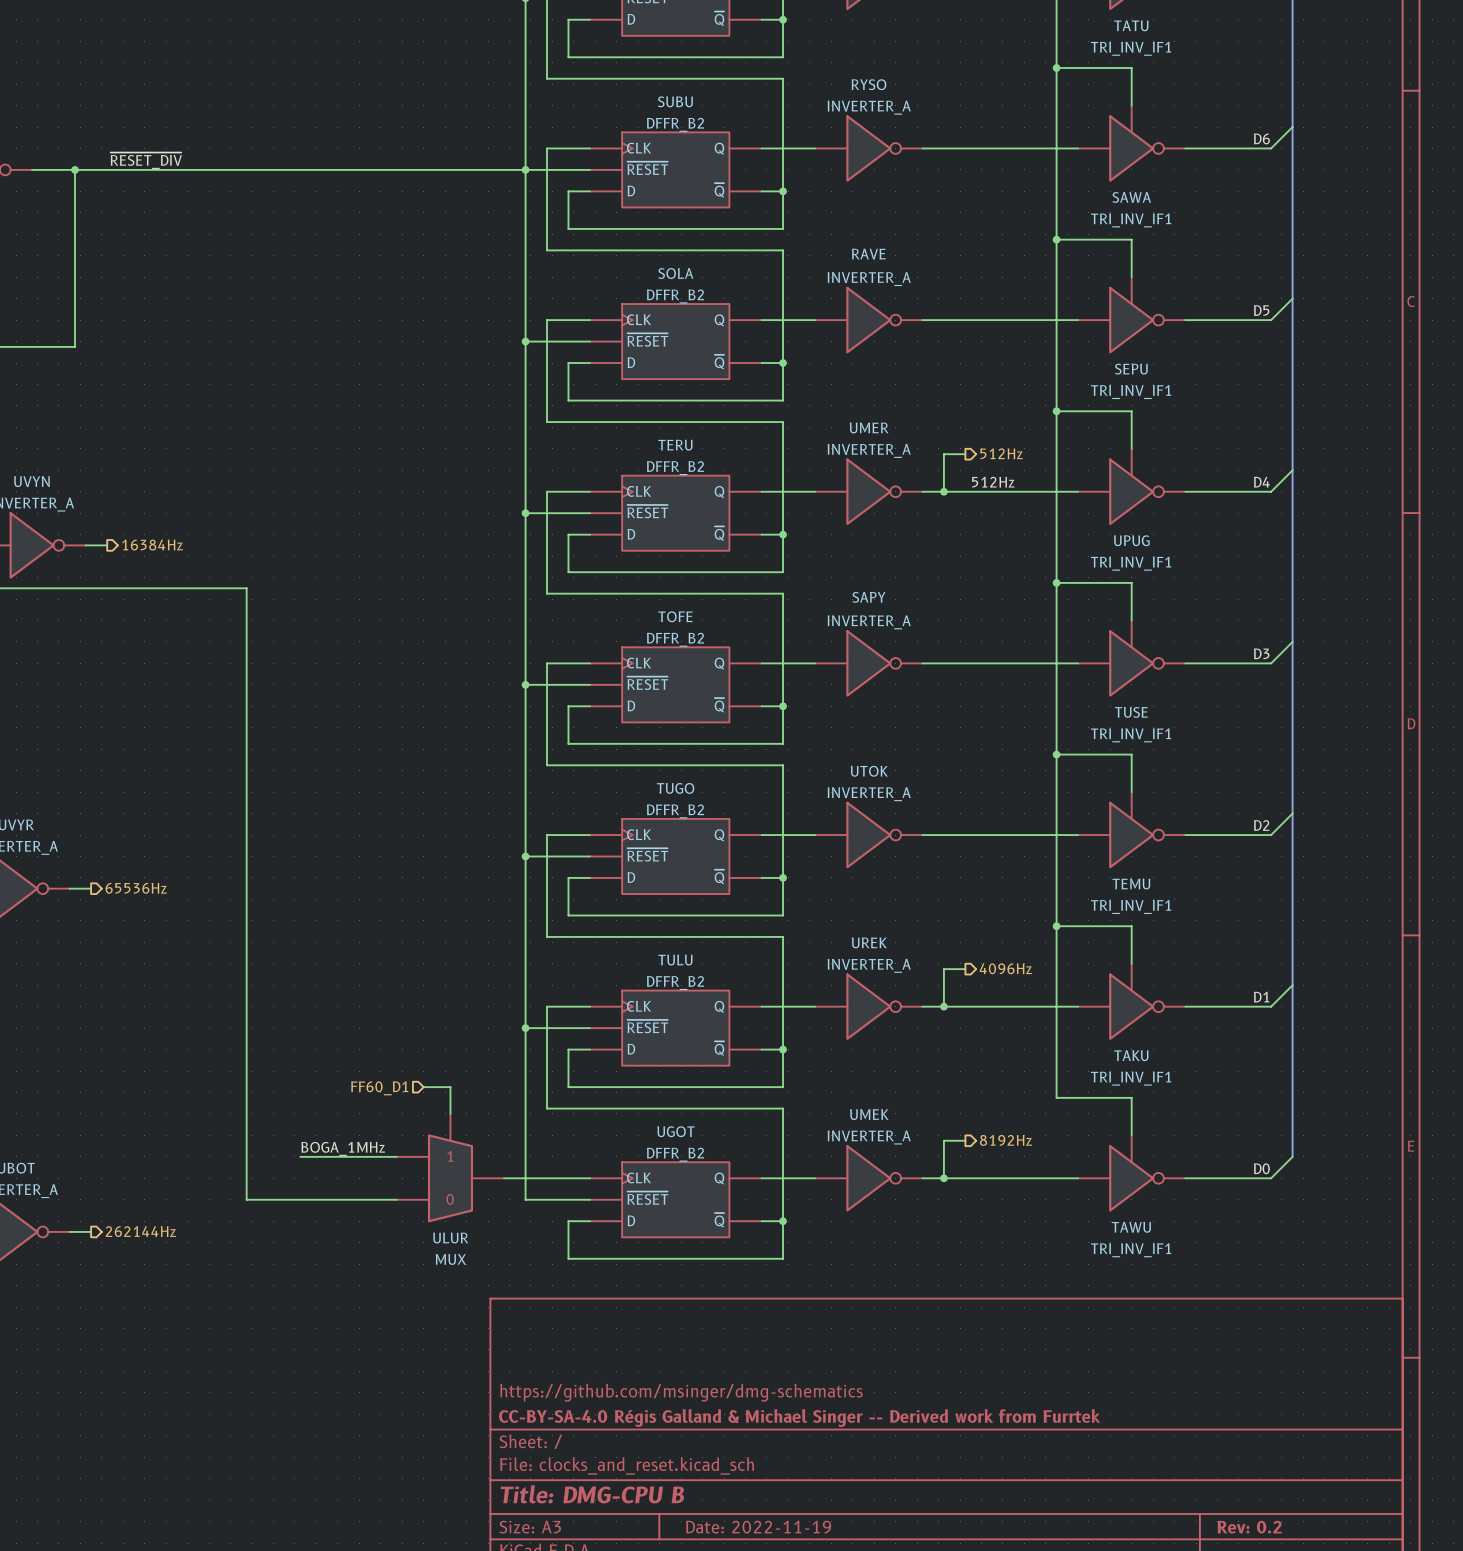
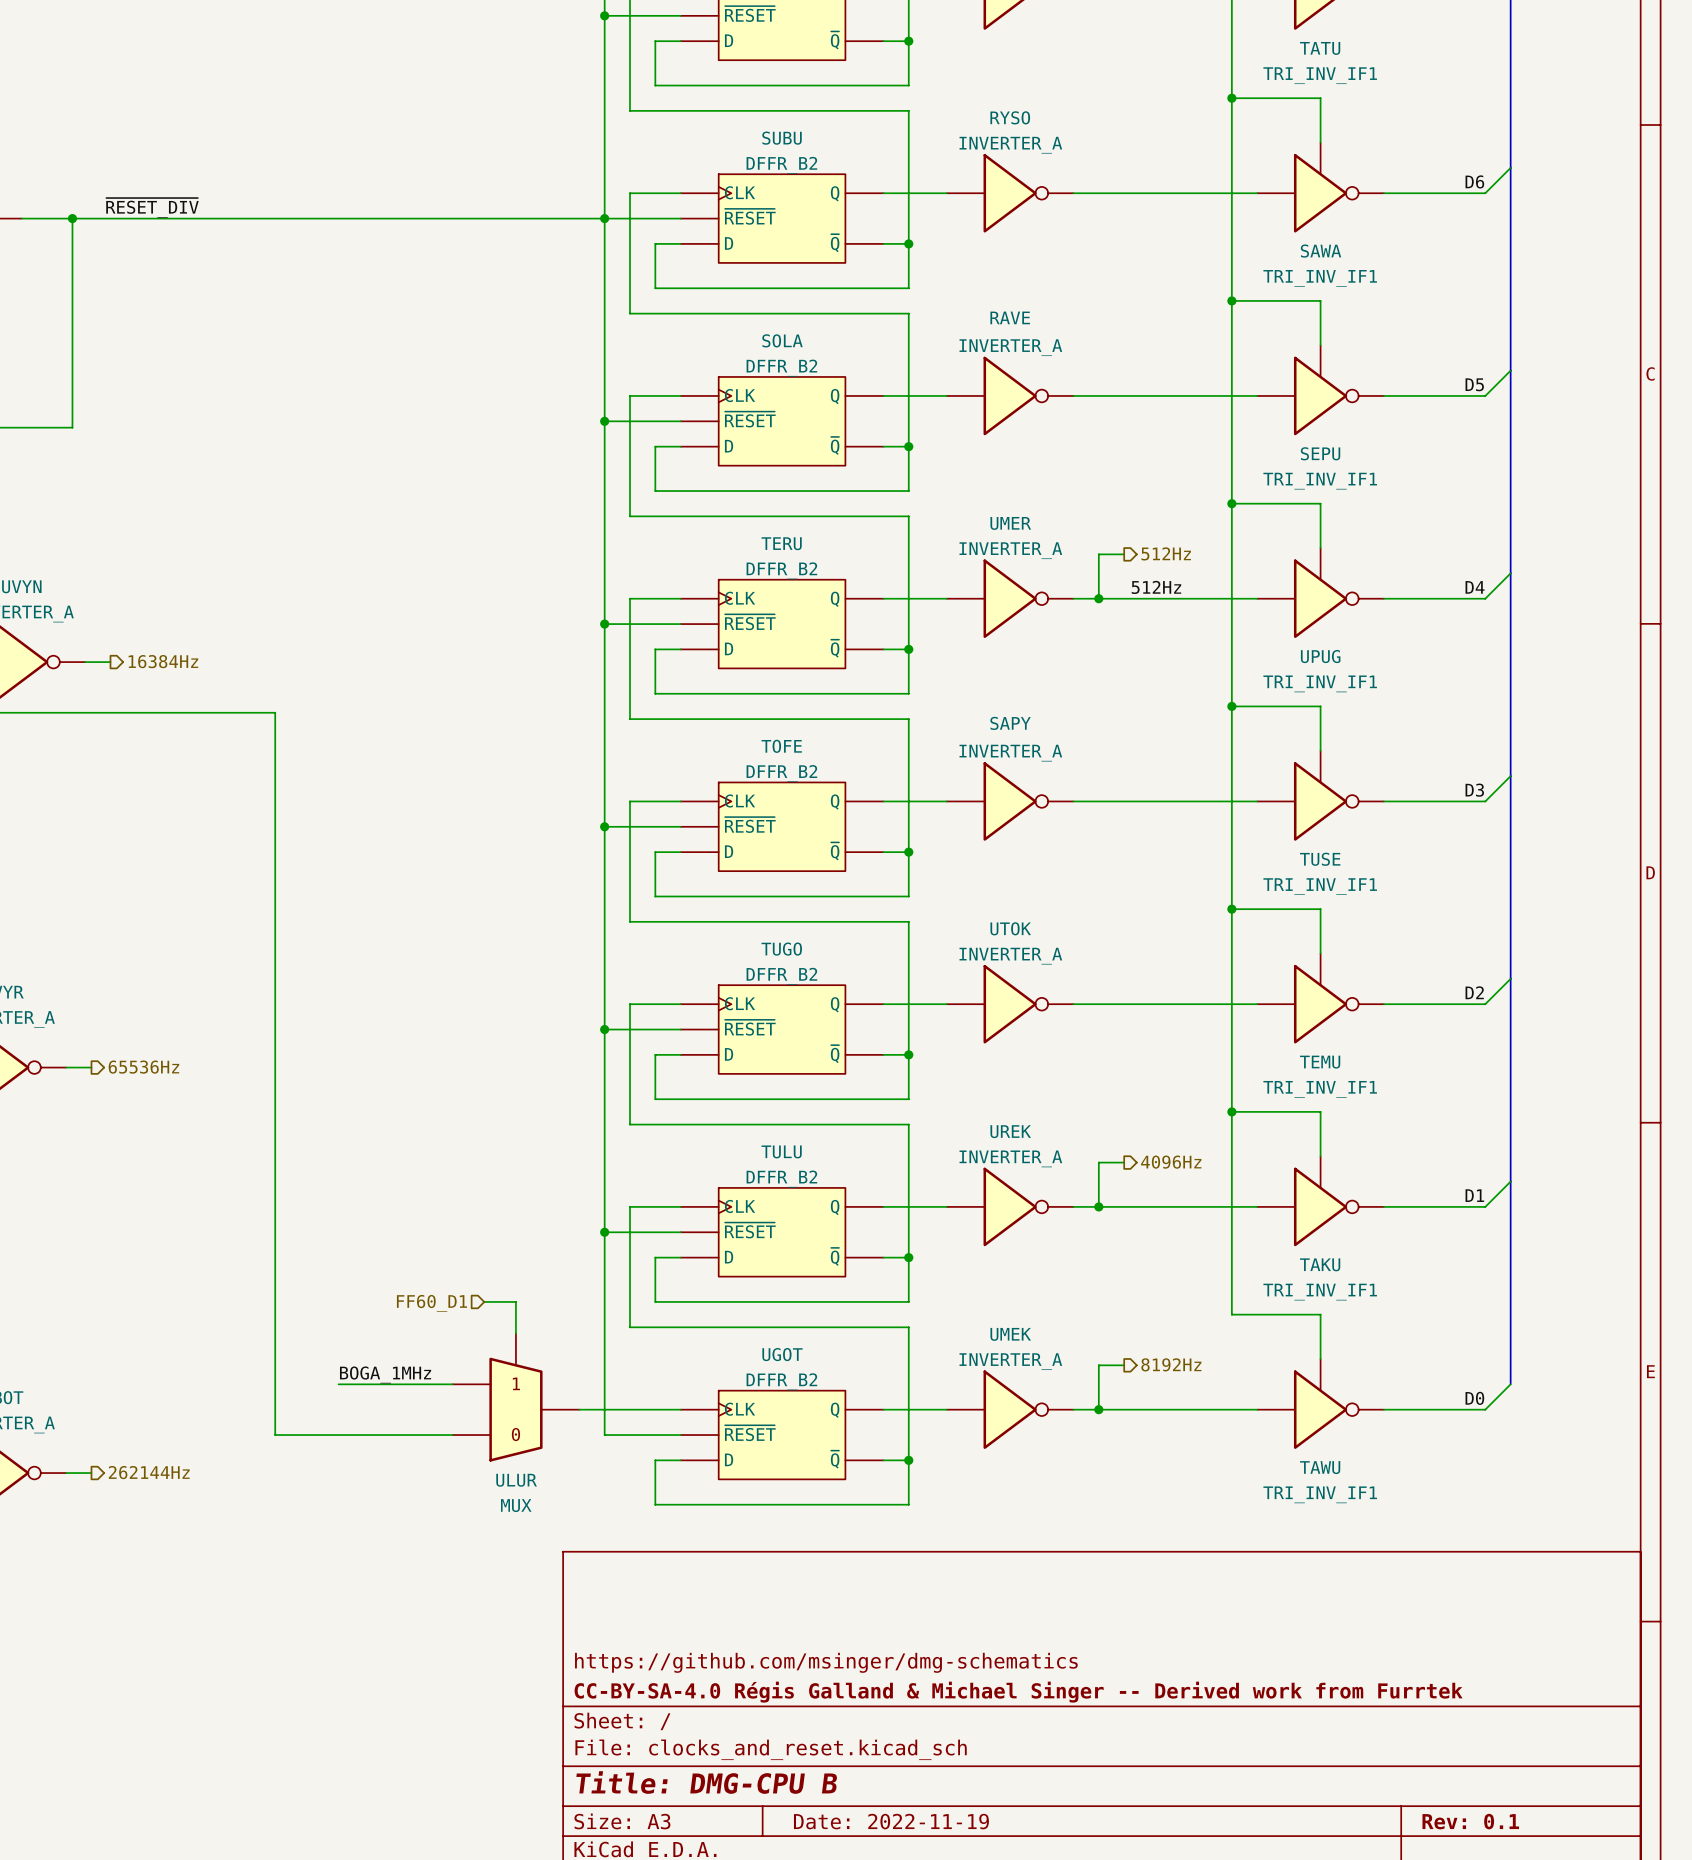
title block: Rev: 0.2 (1249, 1527) -> Rev: 0.1 (1470, 1821)

